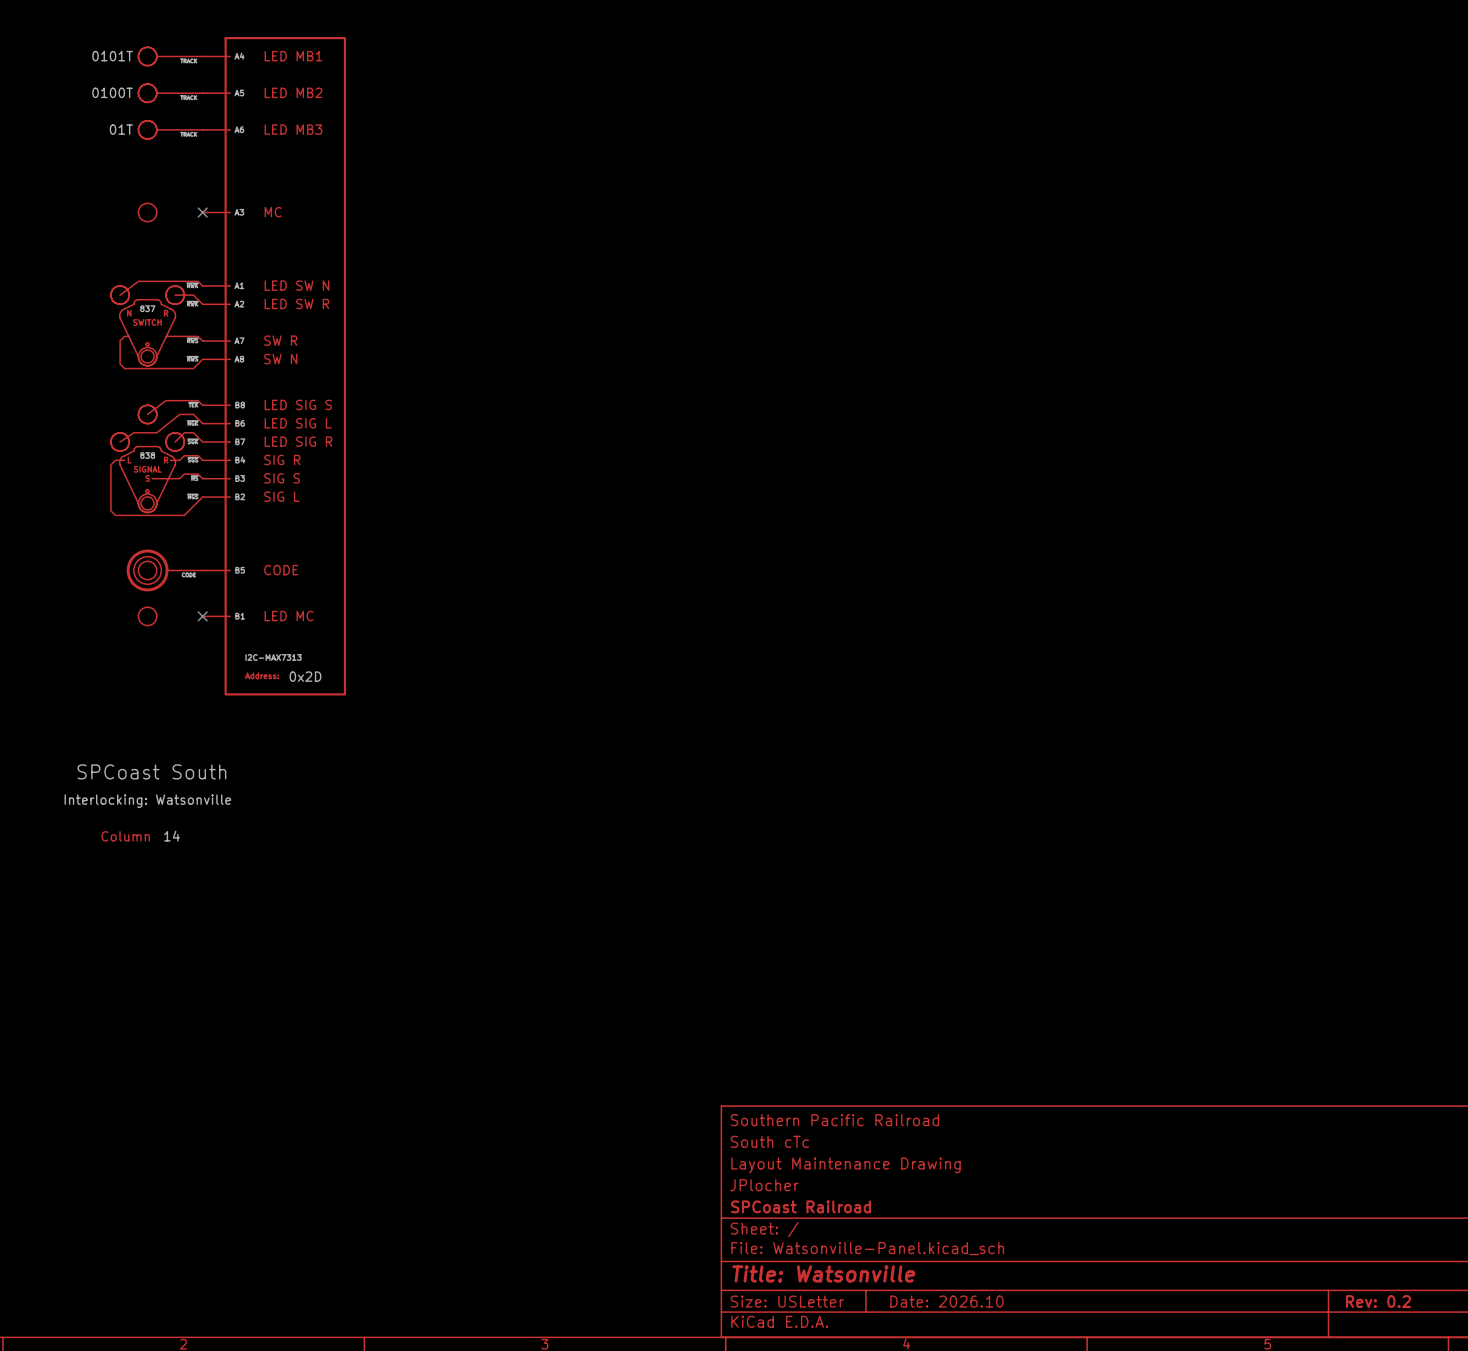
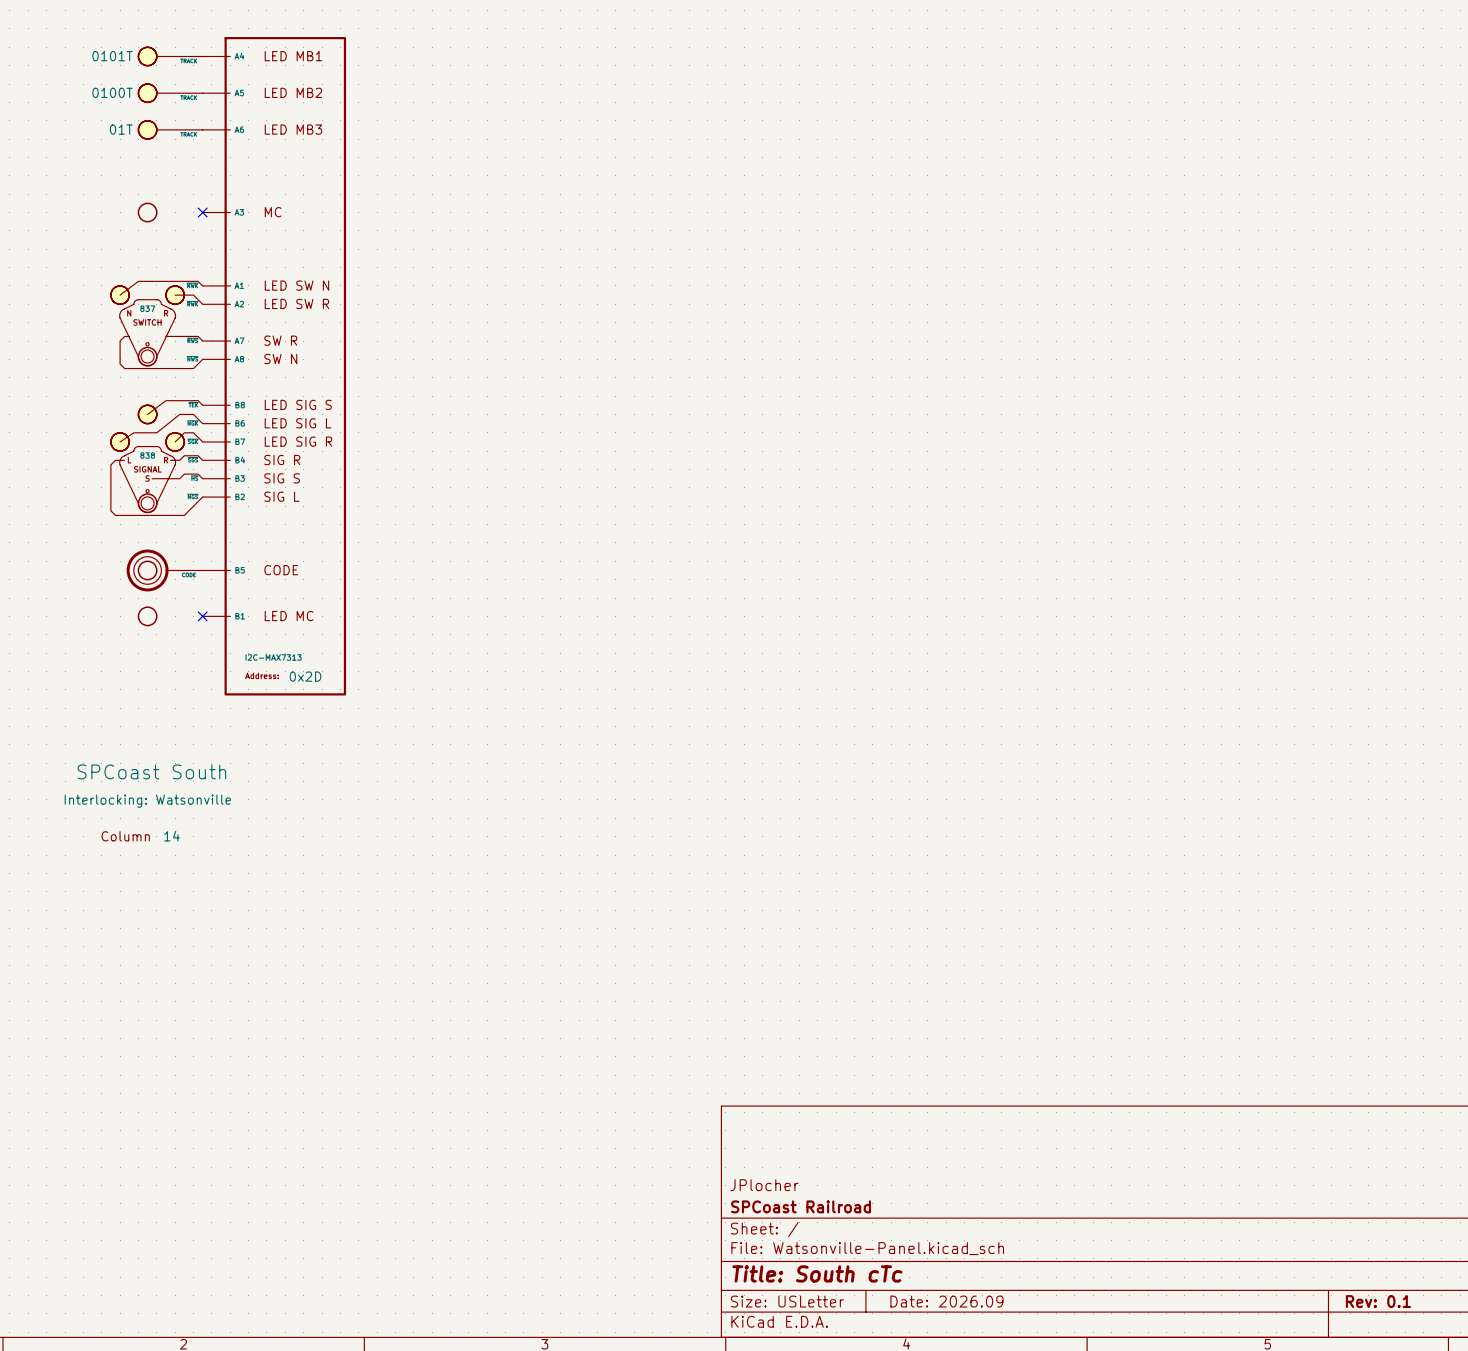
title block: Southern Pacific Railroad (834, 1120) -> none
title block: South cTc (769, 1141) -> none
title block: Layout Maintenance Drawing (846, 1165) -> none
title block: Title: Watsonville (823, 1273) -> Title: South cTc (817, 1273)
title block: Date: 2026.10 (946, 1301) -> Date: 2026.09 (946, 1301)
title block: Rev: 0.2 (1378, 1301) -> Rev: 0.1 (1378, 1301)

